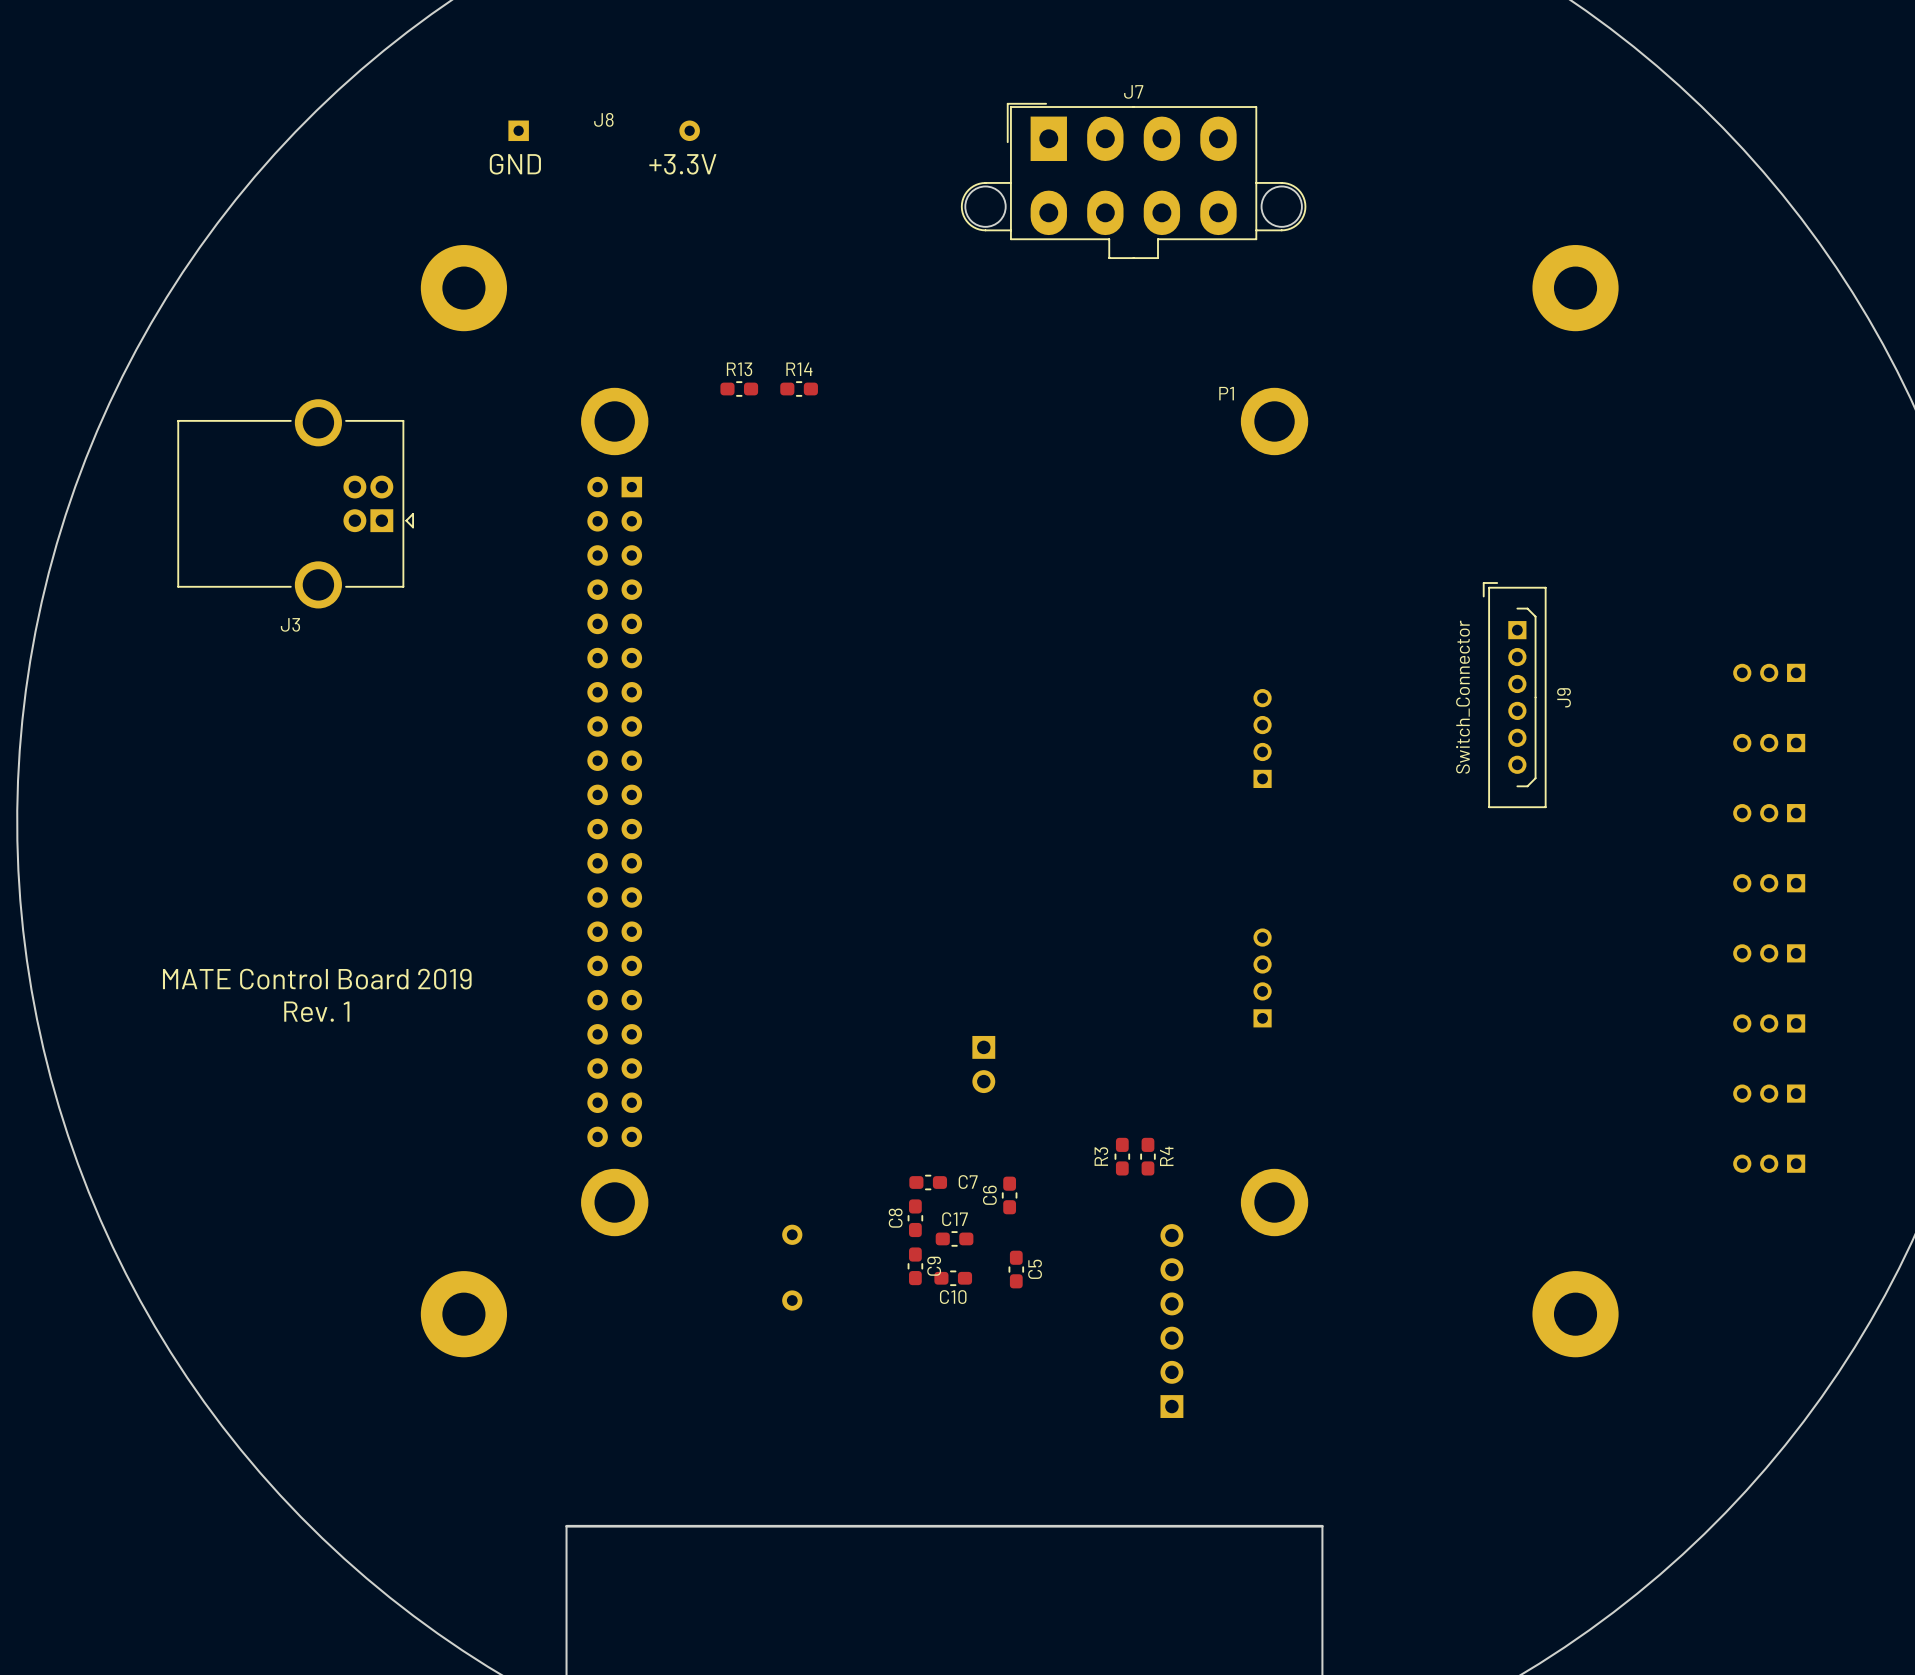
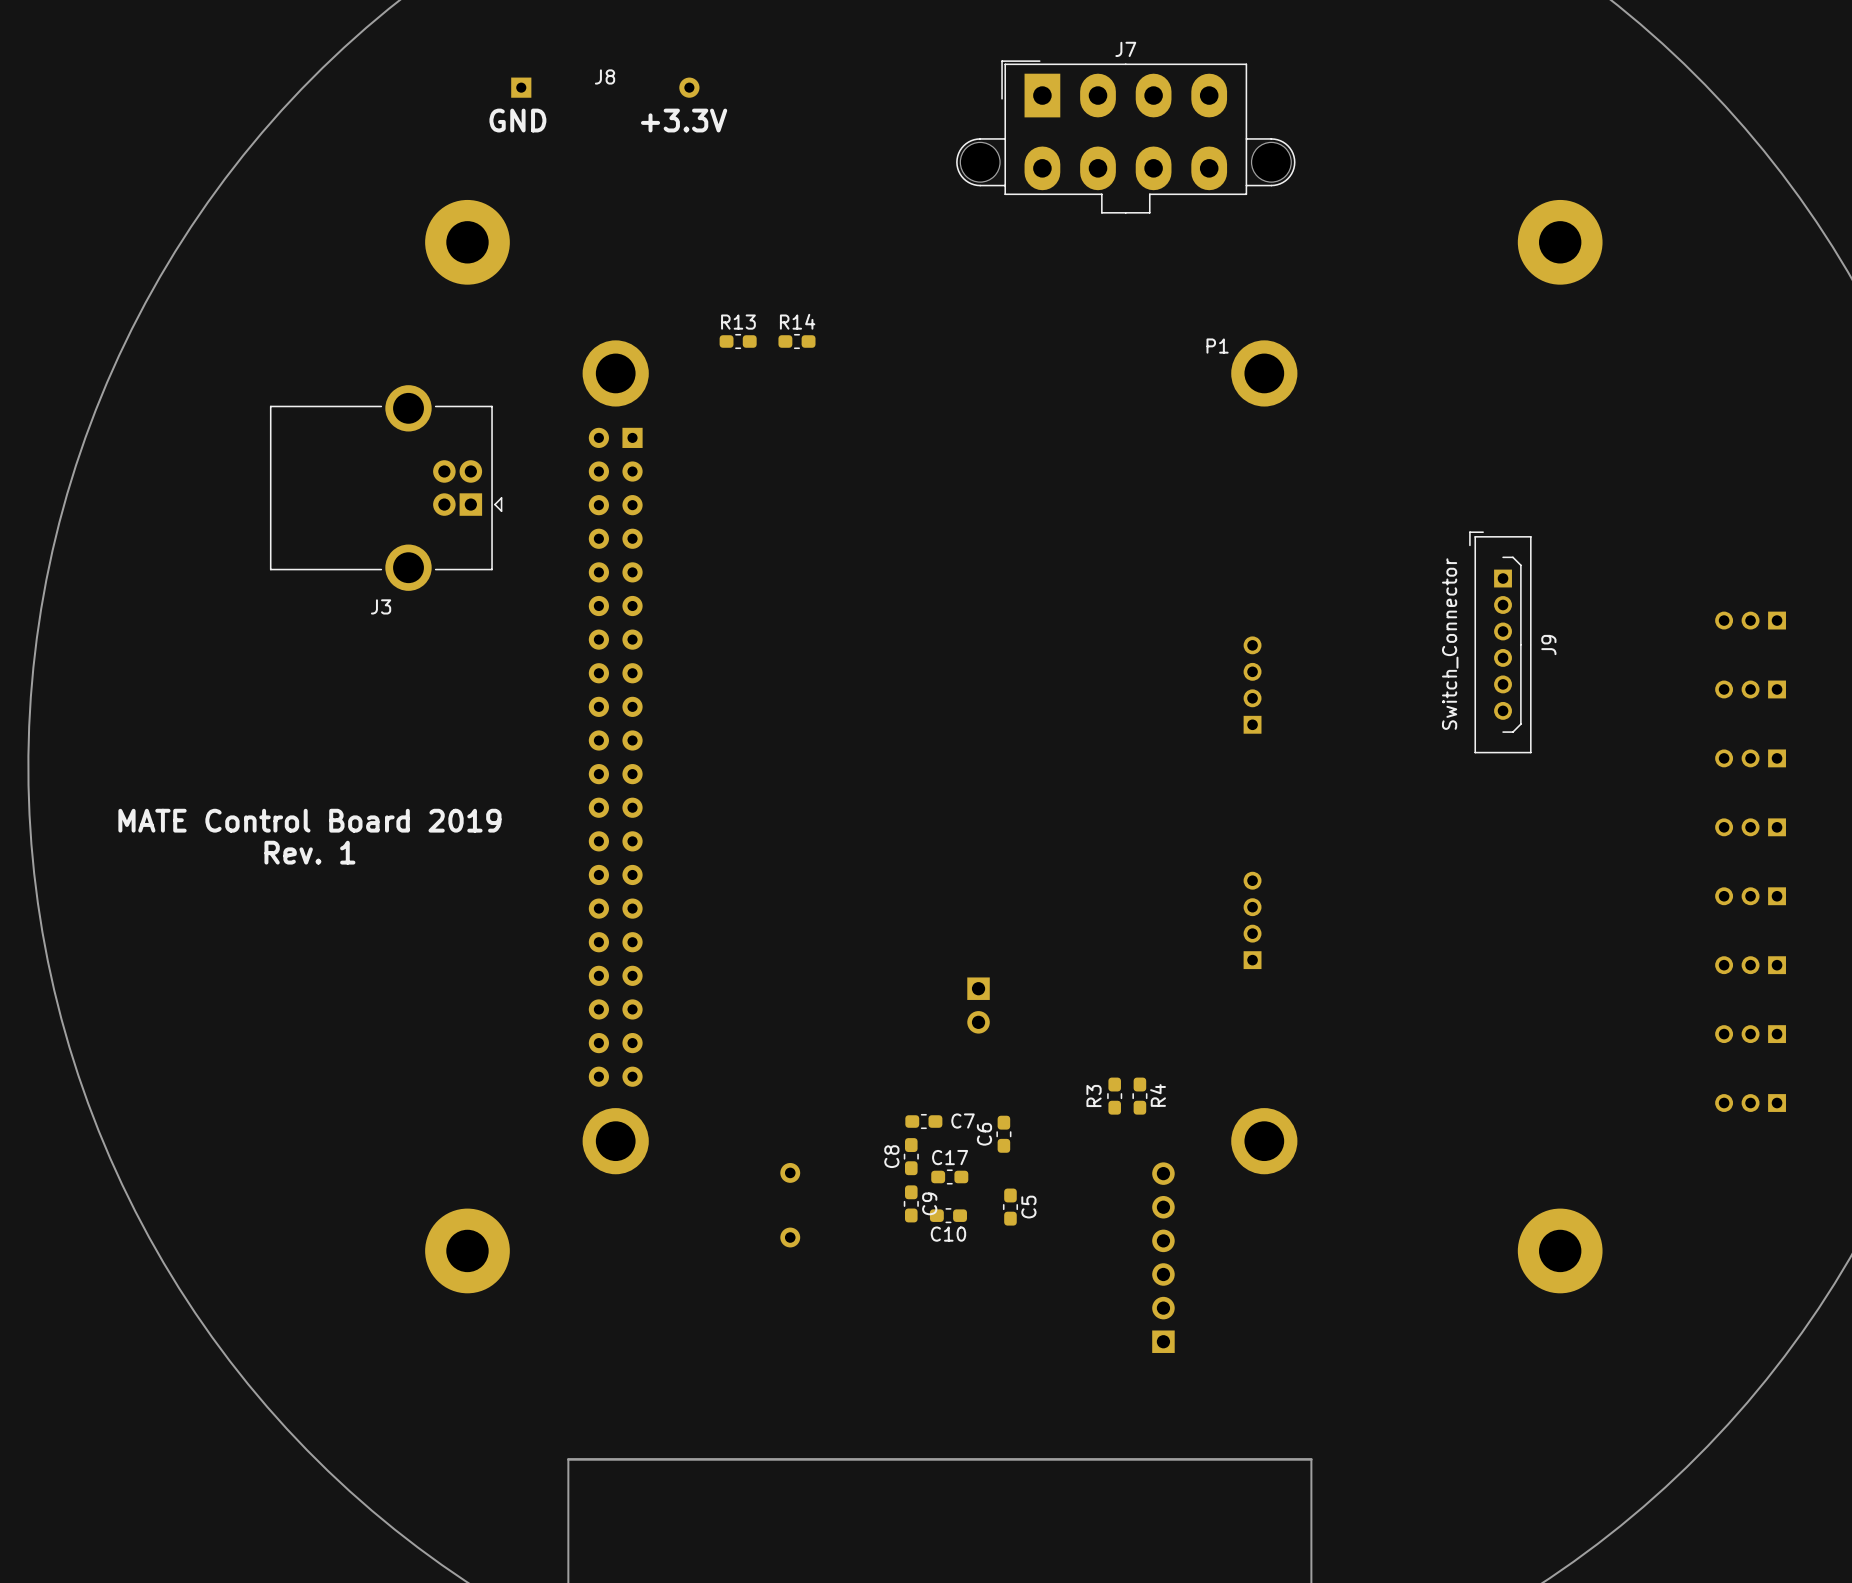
J3 position: (295, 503) -> (386, 488)
text position: MATE Control Board 2019 (317, 979) -> MATE Control Board 2019 (309, 820)
text position: Rev. 1 (316, 1011) -> Rev. 1 (309, 852)

